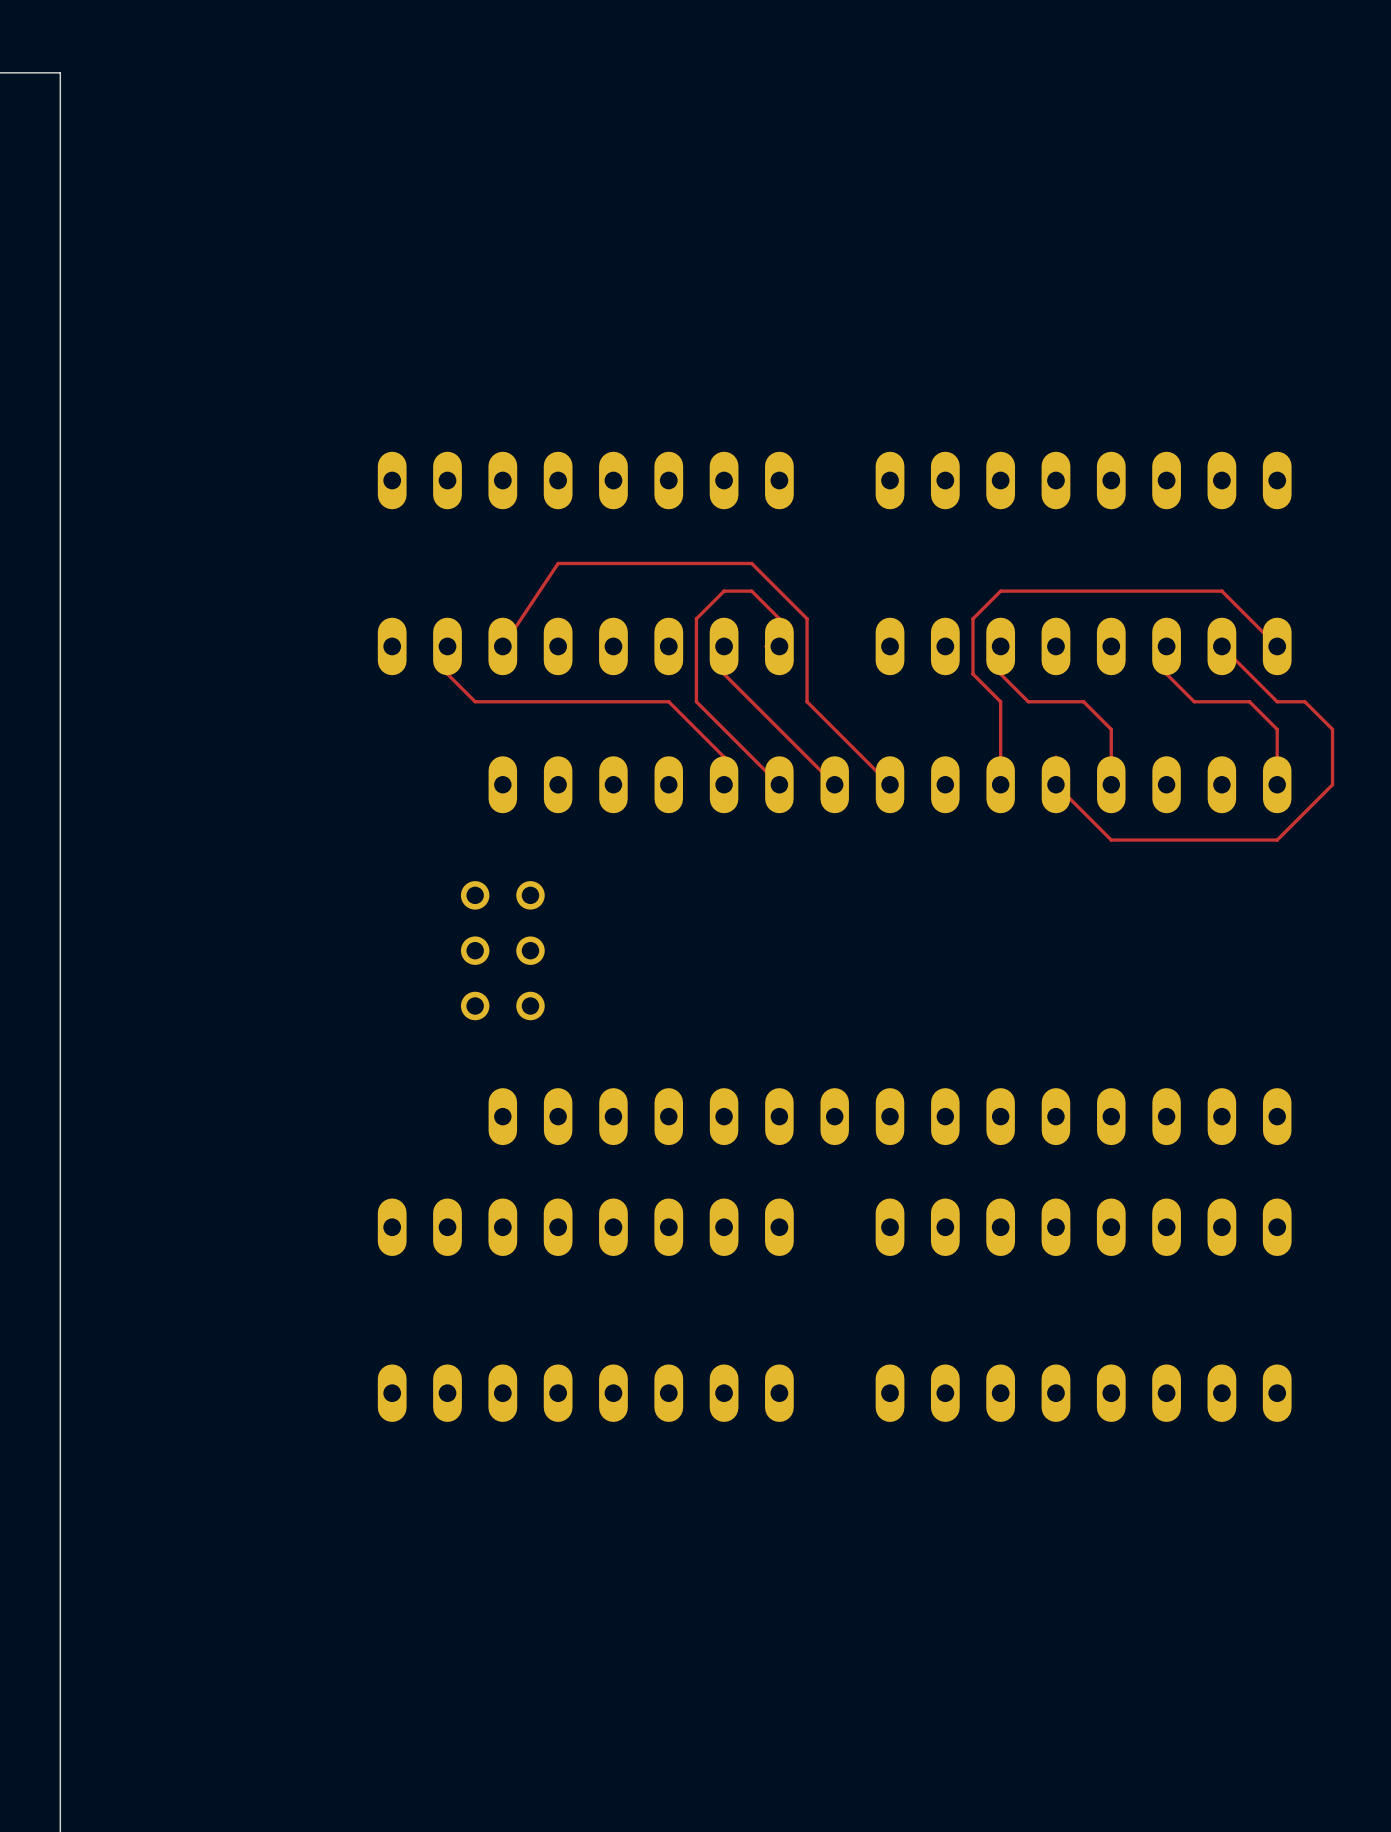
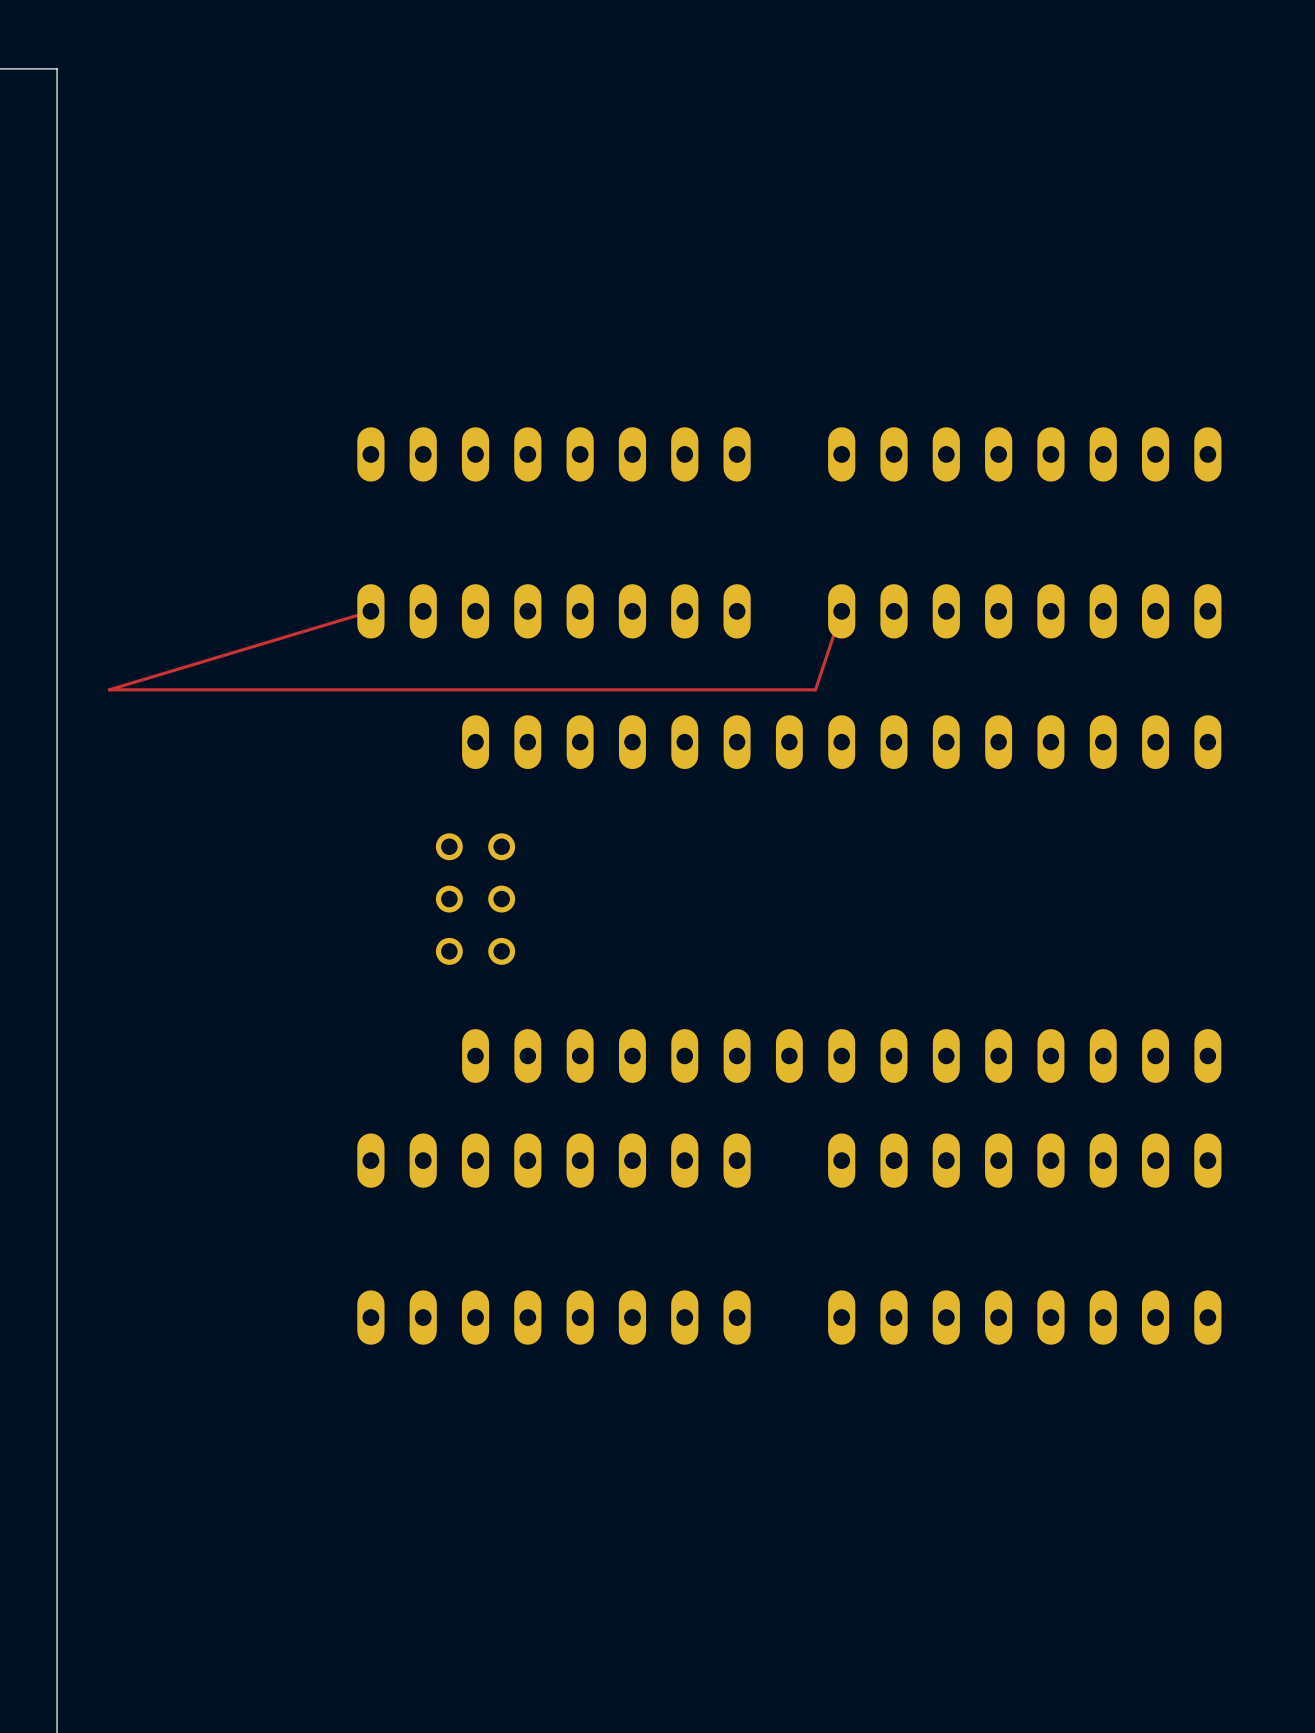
top track: (447, 646) (447, 674) (475, 701) (668, 701) (724, 757) (724, 784) -> none
top track: (502, 646) (558, 563) (751, 563) (807, 618) (807, 701) (890, 784) -> none
top track: (724, 646) (724, 674) (834, 784) -> none
top track: (765, 646) (779, 646) (779, 618) (751, 591) (724, 591) (696, 618) (696, 701) (779, 784) -> none
top track: none -> (841, 611) (815, 689) (109, 689) (370, 611)
top track: (1000, 646) (1000, 674) (1028, 701) (1083, 701) (1111, 729) (1111, 784) -> none
top track: (1166, 646) (1166, 674) (1194, 701) (1249, 701) (1277, 729) (1277, 784) -> none
top track: (1221, 646) (1277, 701) (1304, 701) (1332, 729) (1332, 784) (1277, 840) (1111, 840) (1055, 784) (1055, 757) -> none
top track: (1277, 646) (1221, 591) (1000, 591) (972, 618) (972, 674) (1000, 701) (1000, 784) -> none

